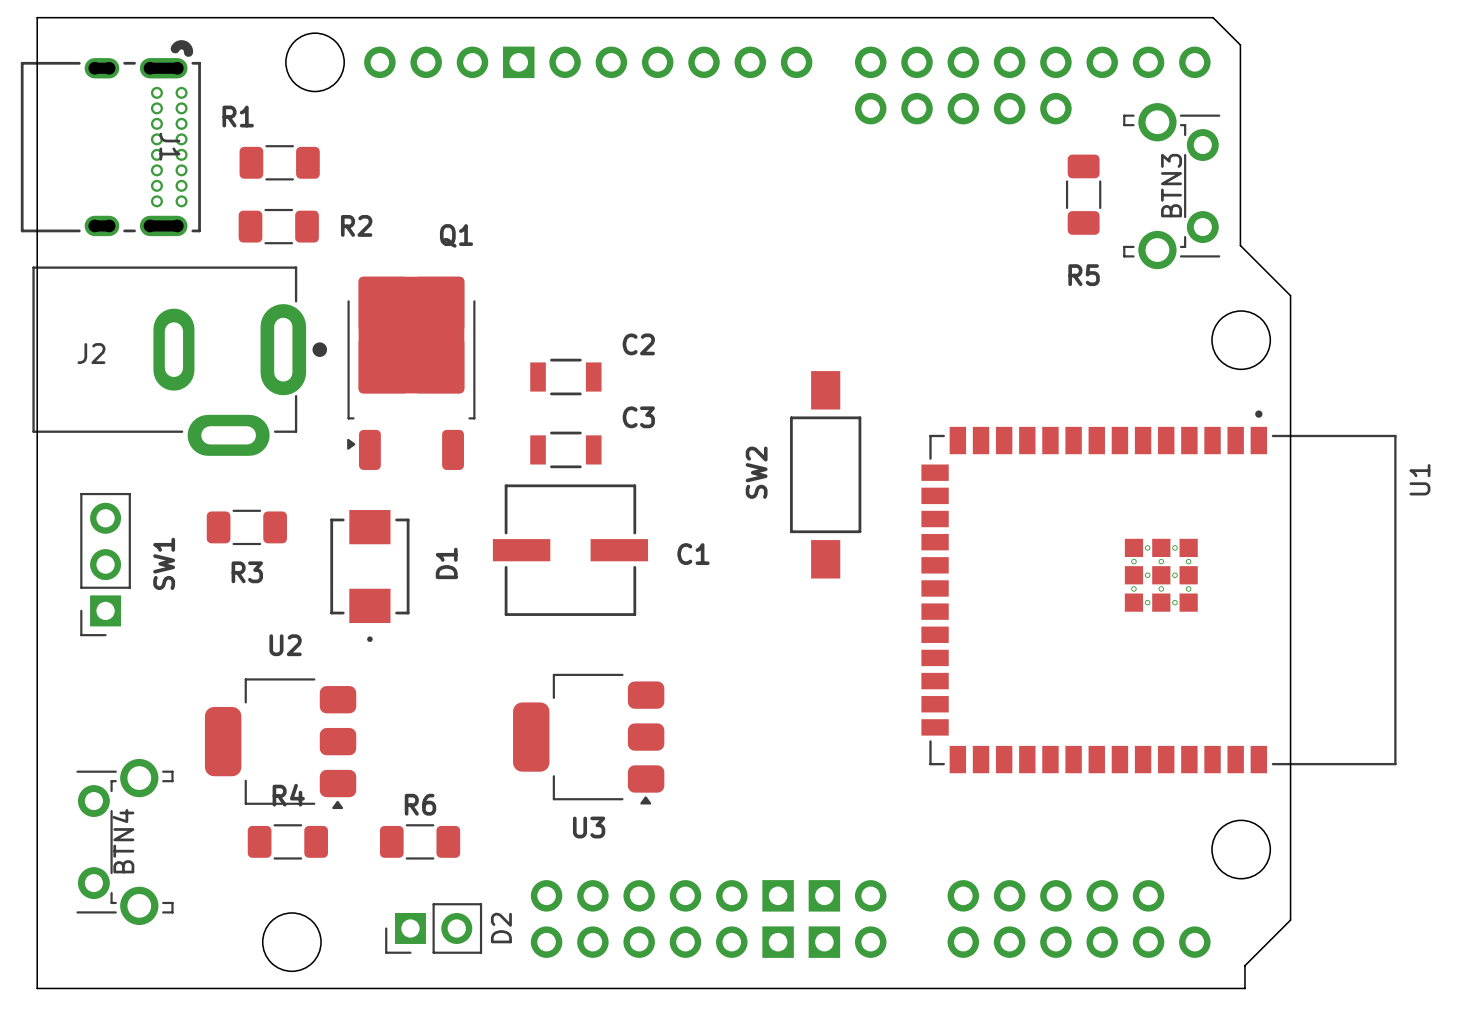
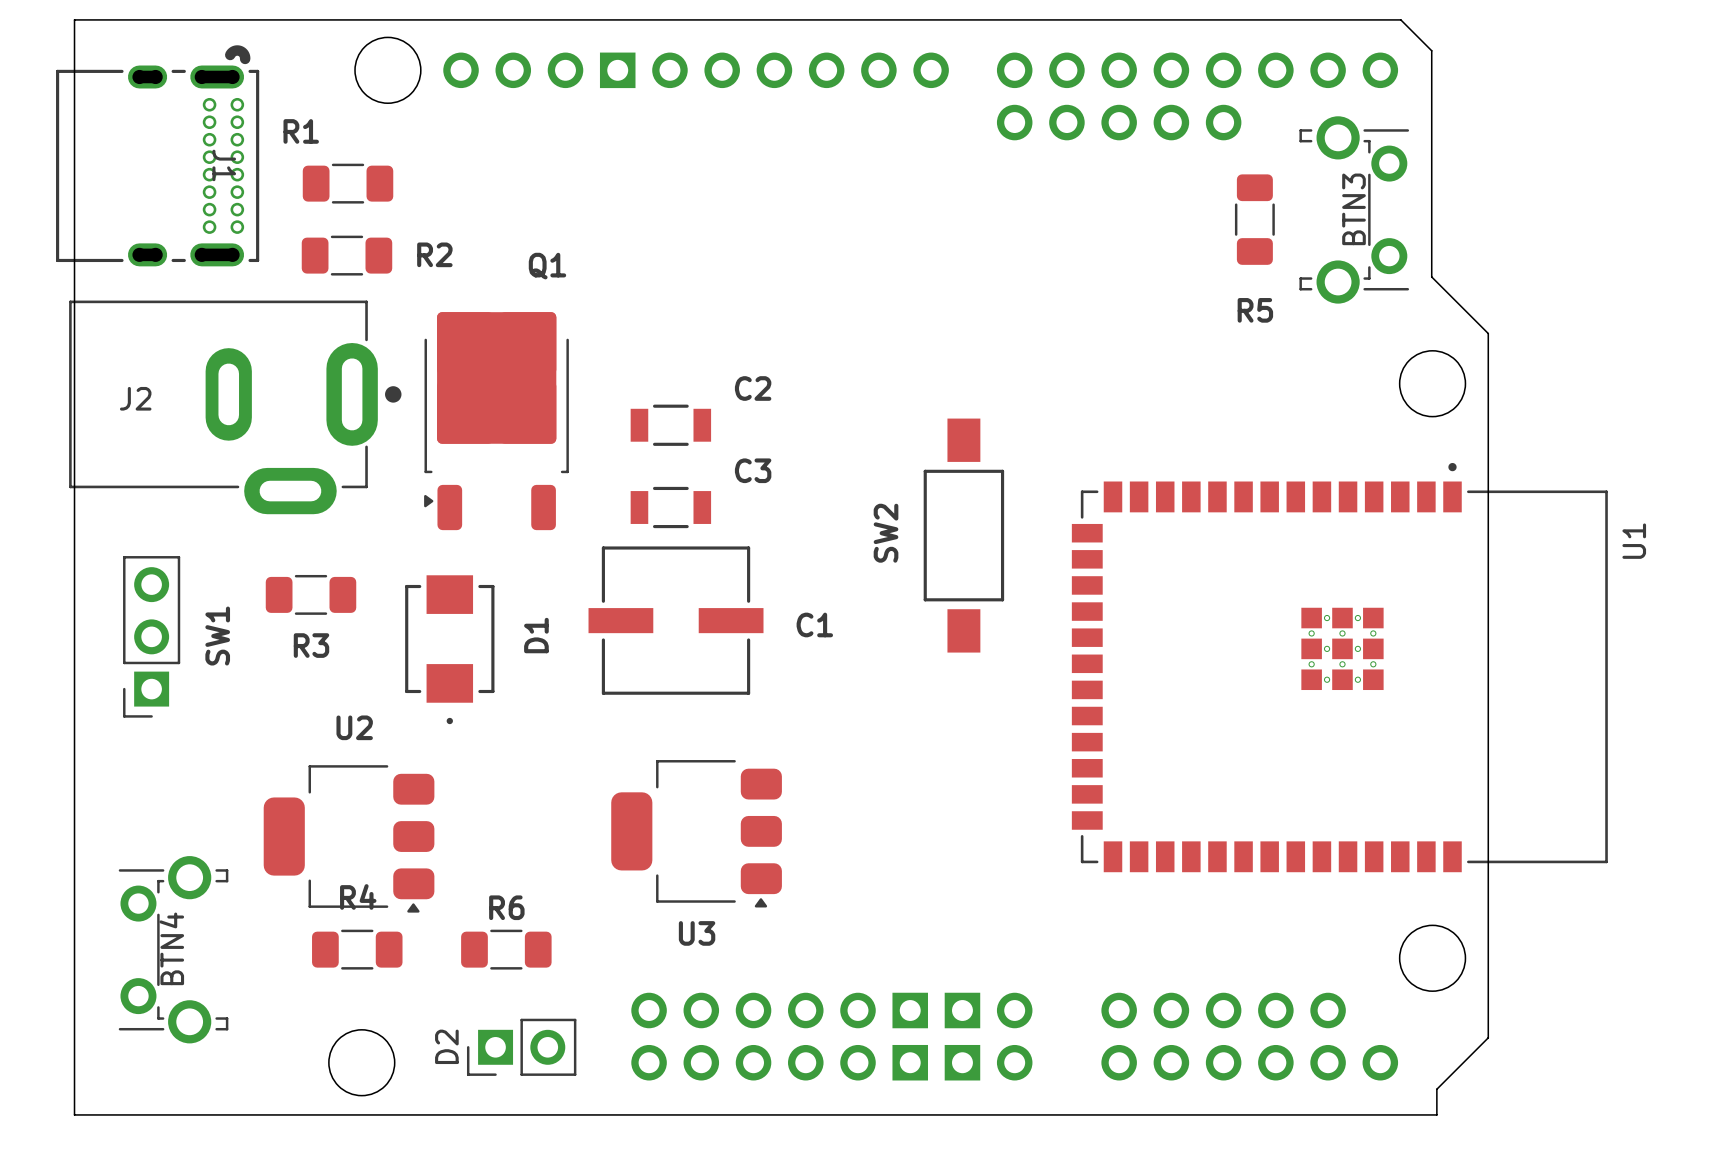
D2 name position: D2 (501, 928) -> D2 (446, 1046)

